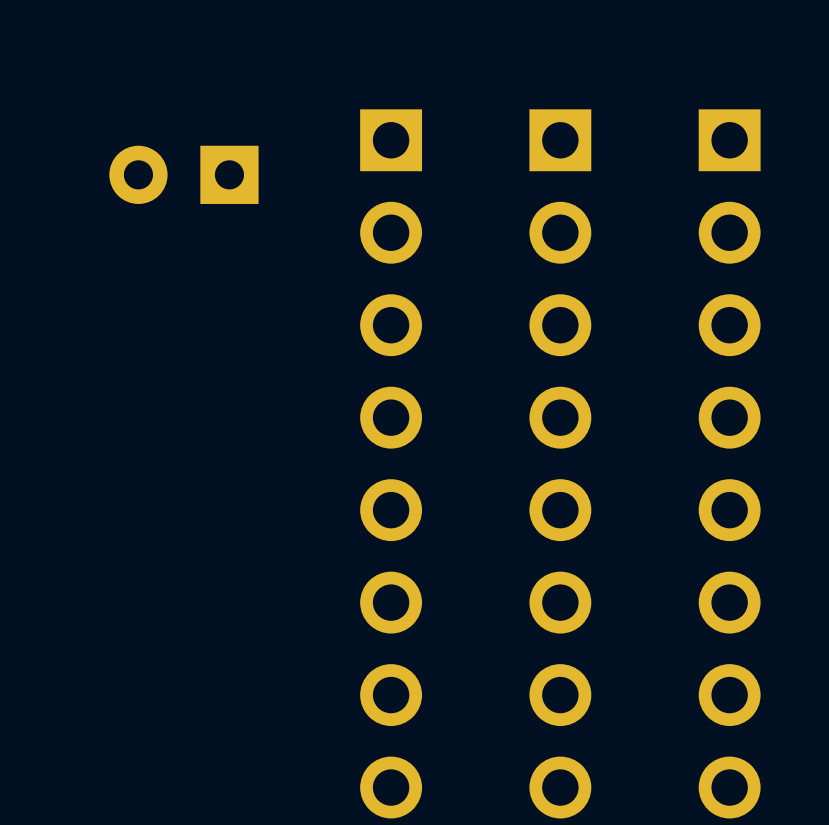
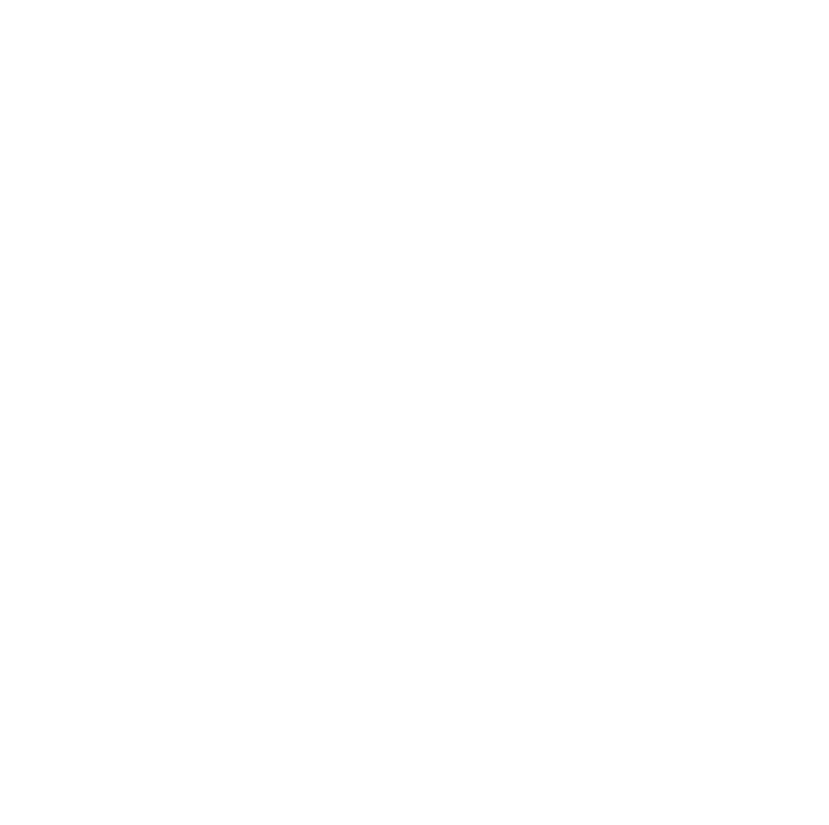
part: (183, 174) -> none
part: (391, 463) -> none
part: (560, 463) -> none
part: (729, 463) -> none

